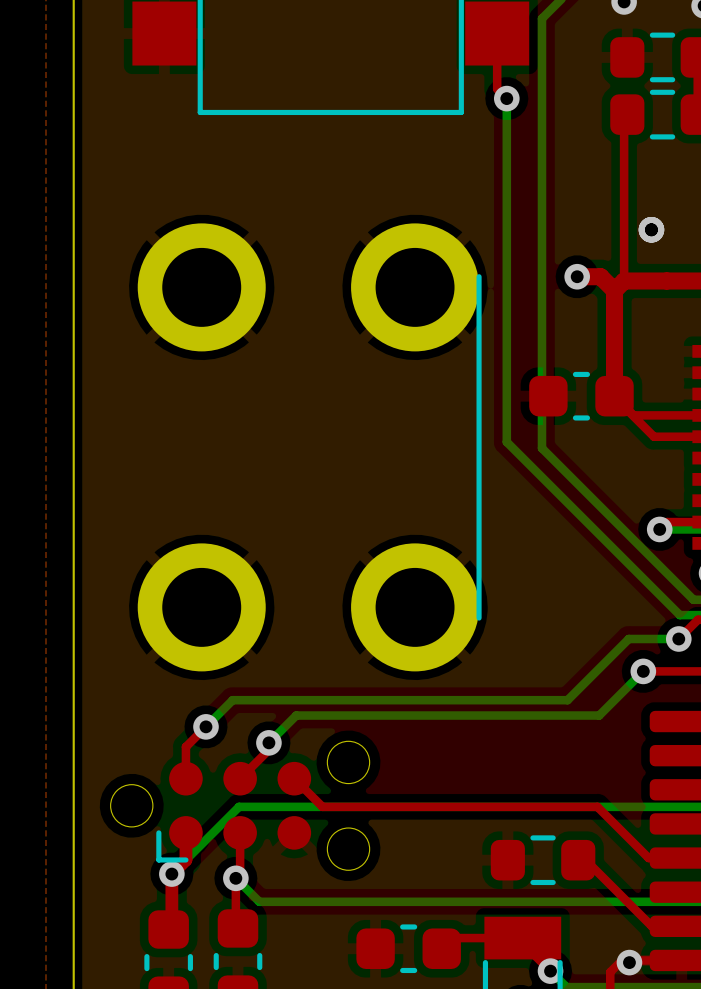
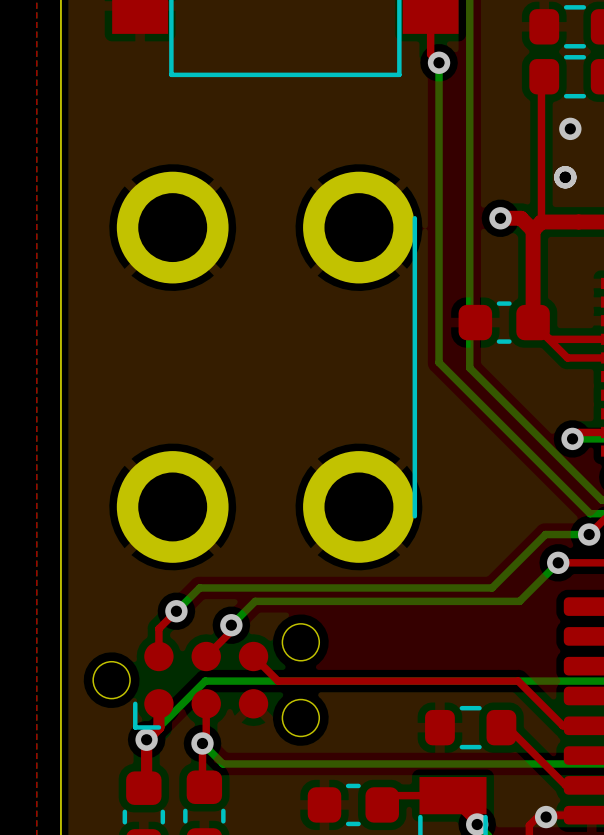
via: none -> (570, 128)

